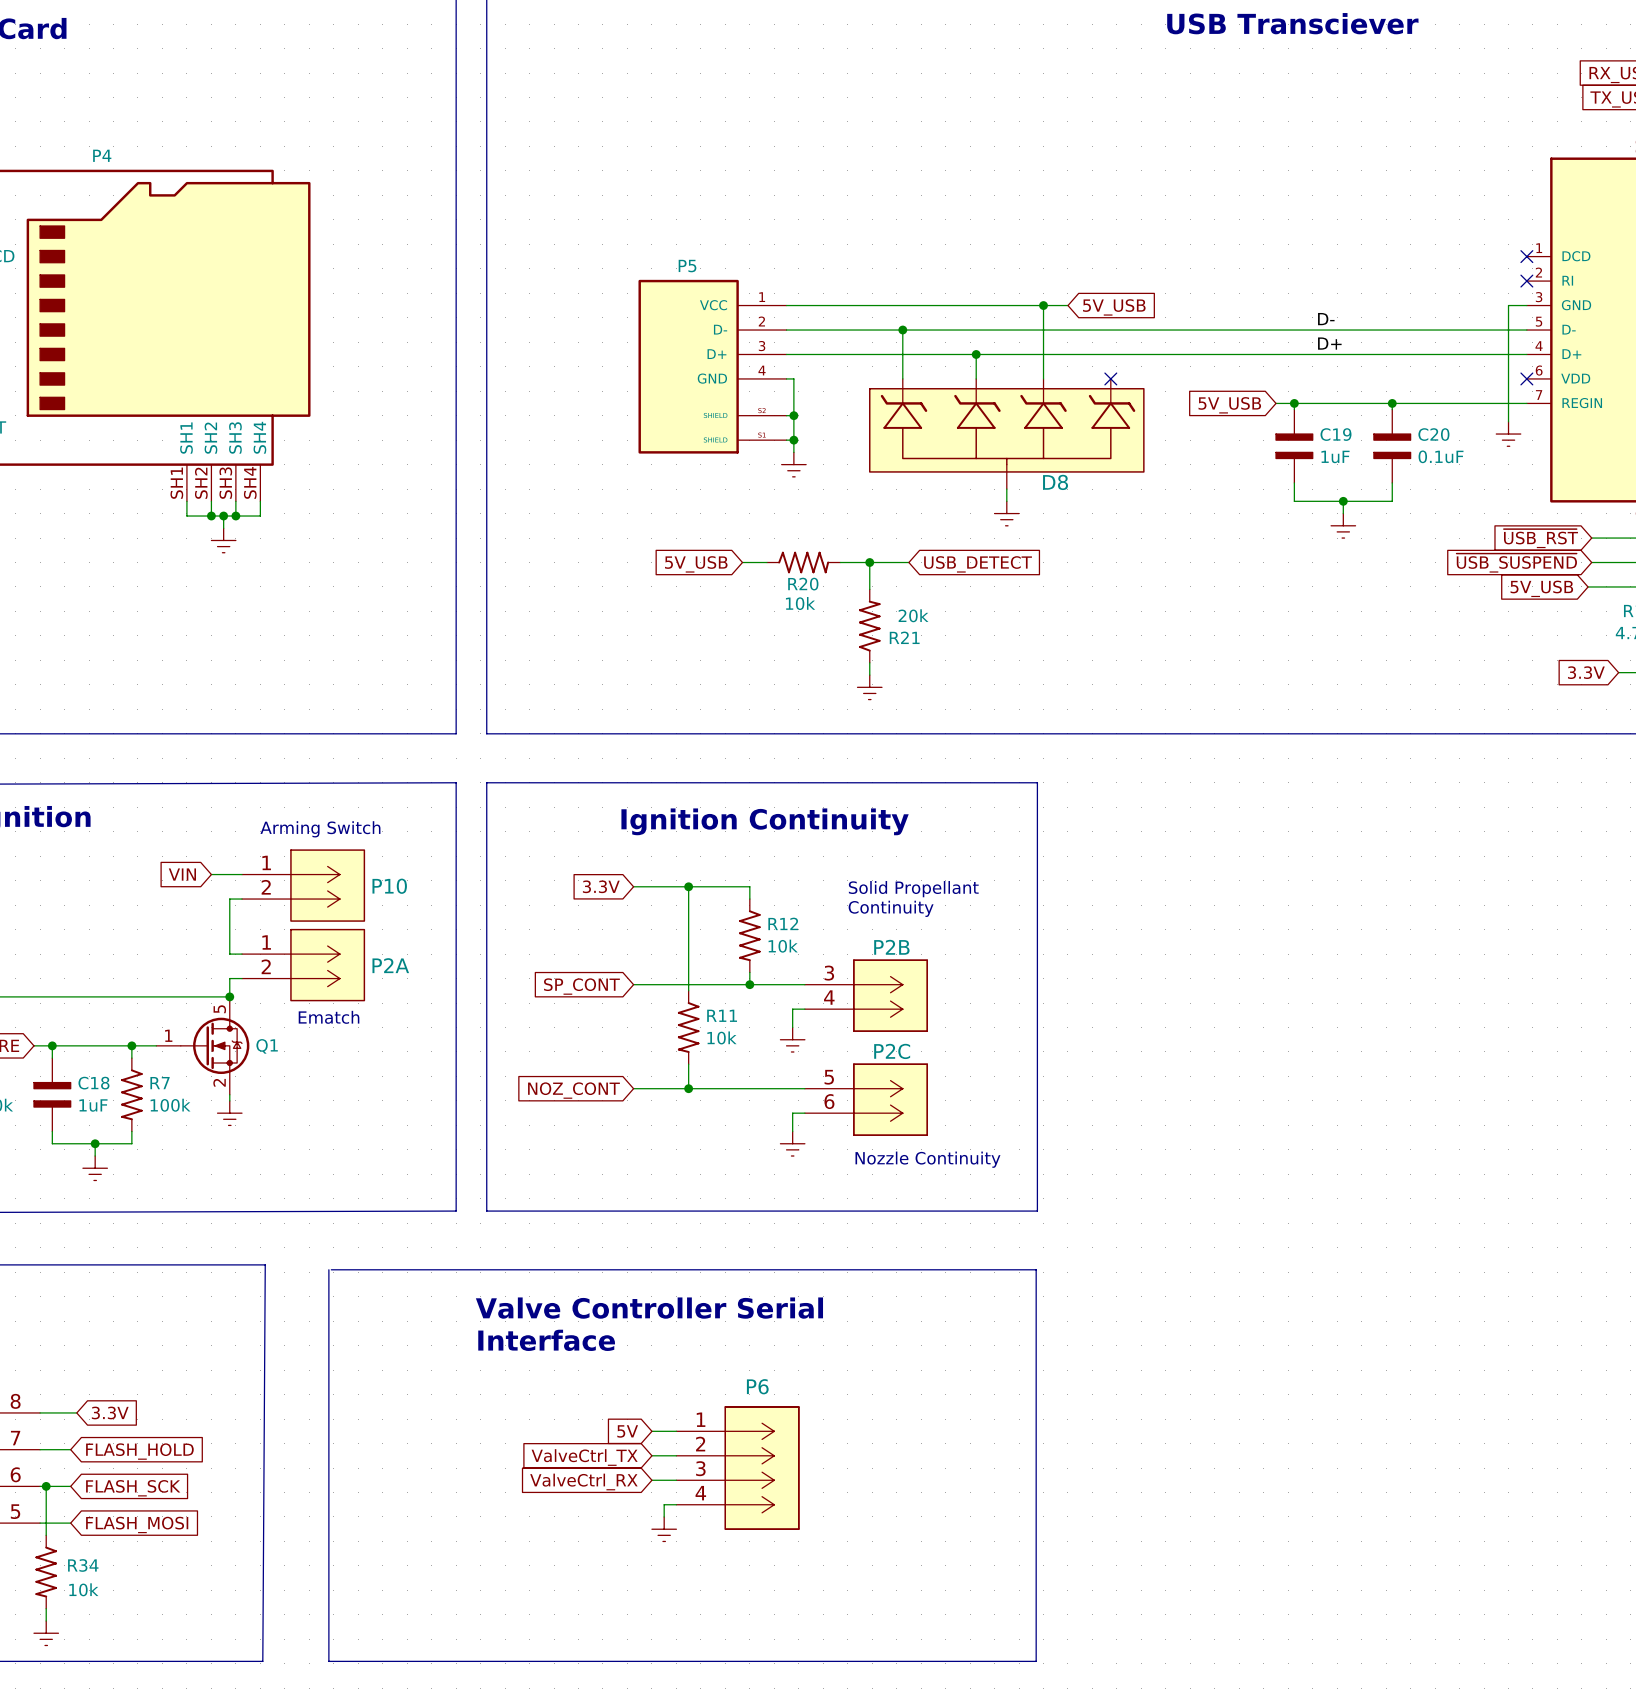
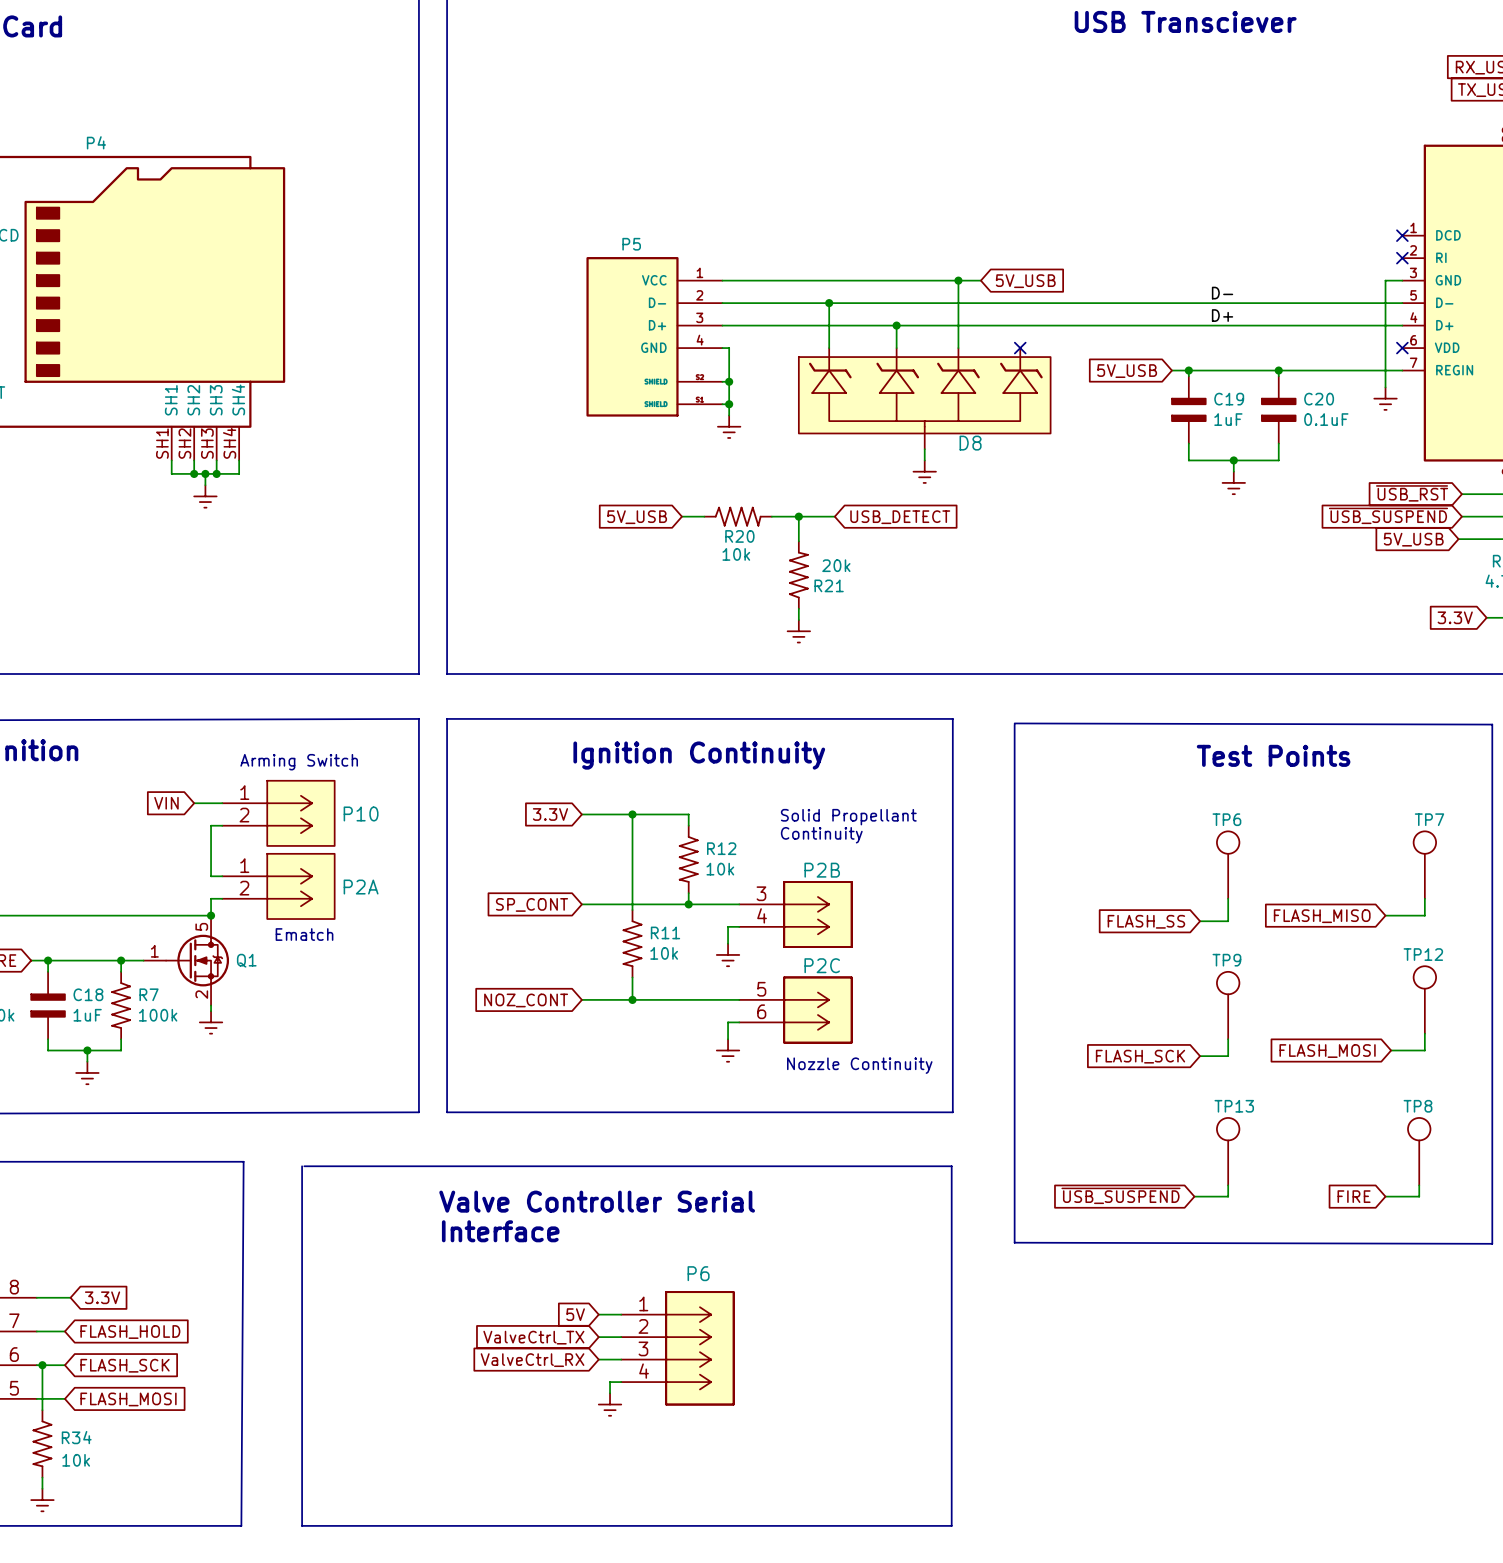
line: none -> (1014, 723) (1492, 724) (1492, 1243) (1014, 1242) (1014, 724)
text: none -> Test Points (1273, 755)
TP6: none -> (1228, 865)
TP7: none -> (1424, 865)
wire: none -> (1228, 898) (1228, 921) (1200, 921)
wire: none -> (1424, 898) (1424, 915) (1385, 915)
global label: none -> FLASH_MISO (1322, 916)
global label: none -> FLASH_SS (1146, 921)
TP12: none -> (1424, 999)
TP9: none -> (1228, 1005)
wire: none -> (1424, 1033) (1424, 1050) (1391, 1050)
wire: none -> (1228, 1039) (1228, 1056) (1200, 1056)
global label: none -> FLASH_MOSI (1327, 1051)
global label: none -> FLASH_SCK (1140, 1056)
TP13: none -> (1228, 1151)
TP8: none -> (1419, 1151)
wire: none -> (1228, 1185) (1228, 1196) (1194, 1196)
wire: none -> (1419, 1185) (1419, 1196) (1385, 1196)
global label: none -> FIRE (1354, 1196)
global label: none -> ~{USB_SUSPEND} (1120, 1195)

